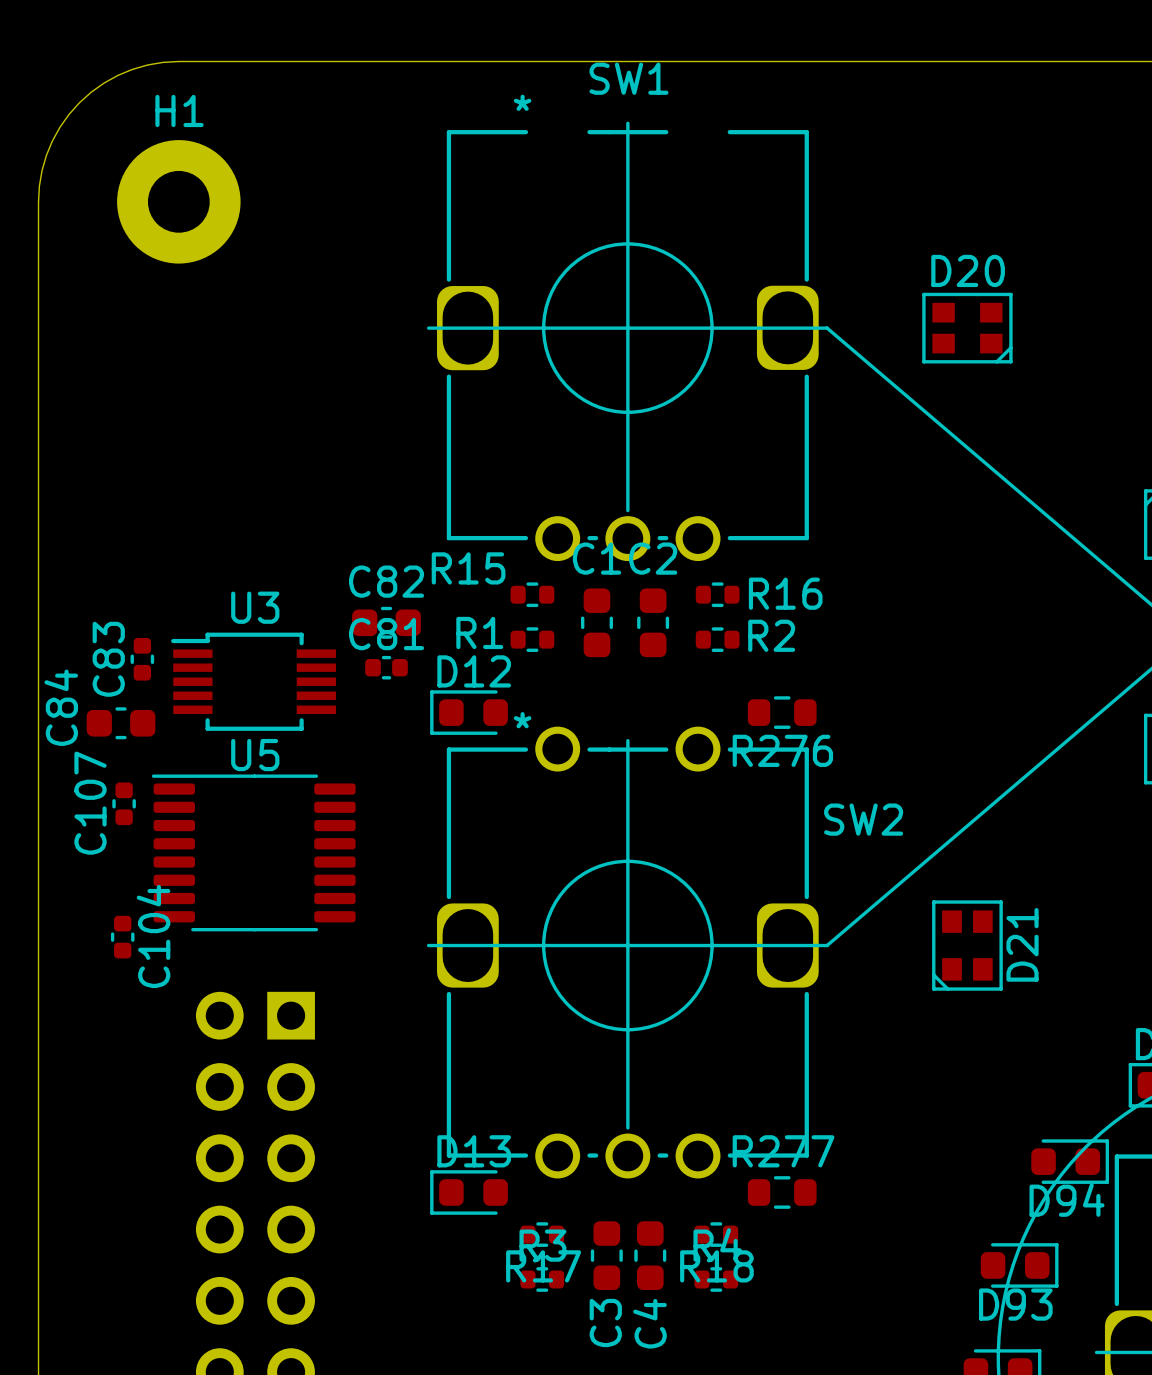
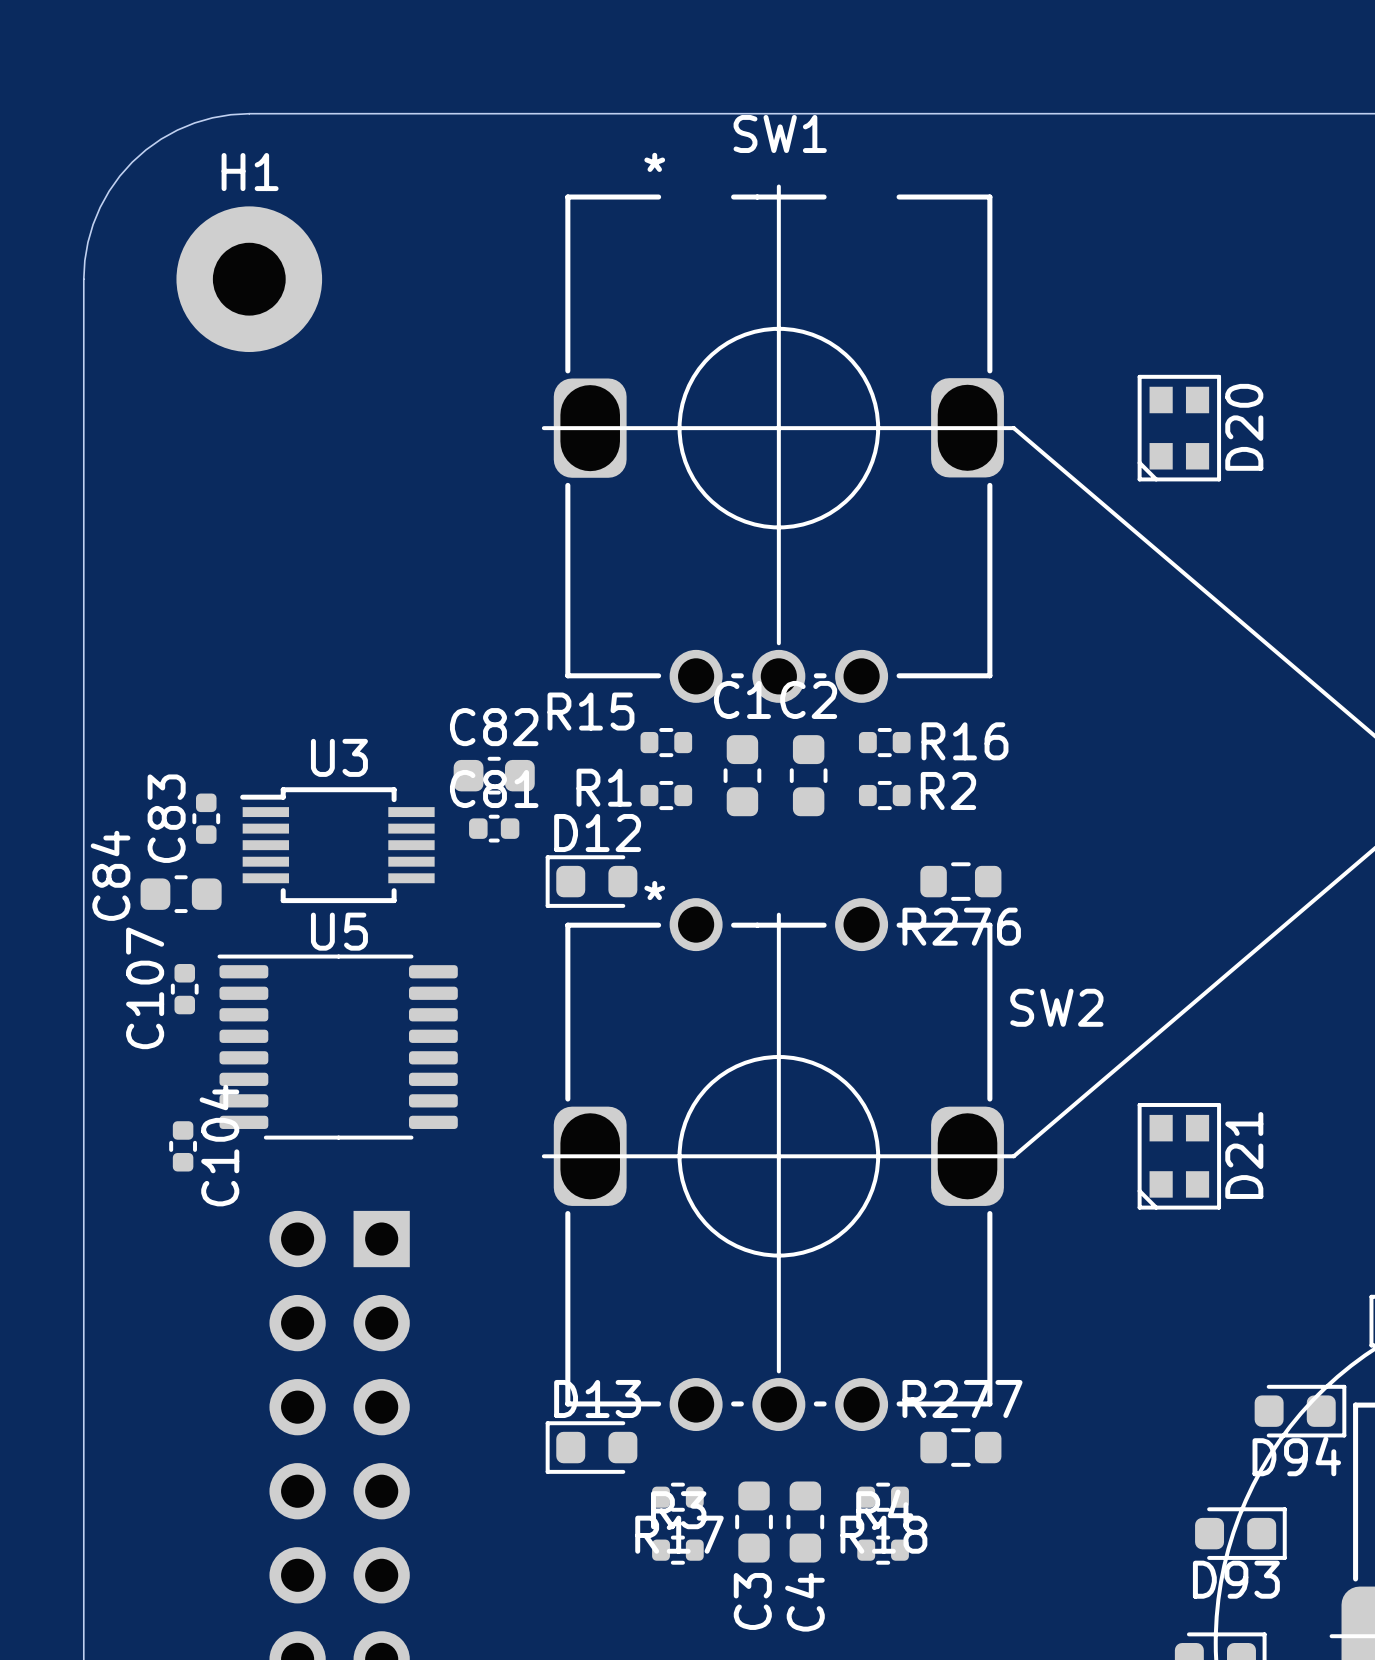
D20 rotation: 0° (967, 328) -> 90° clockwise (1179, 428)

